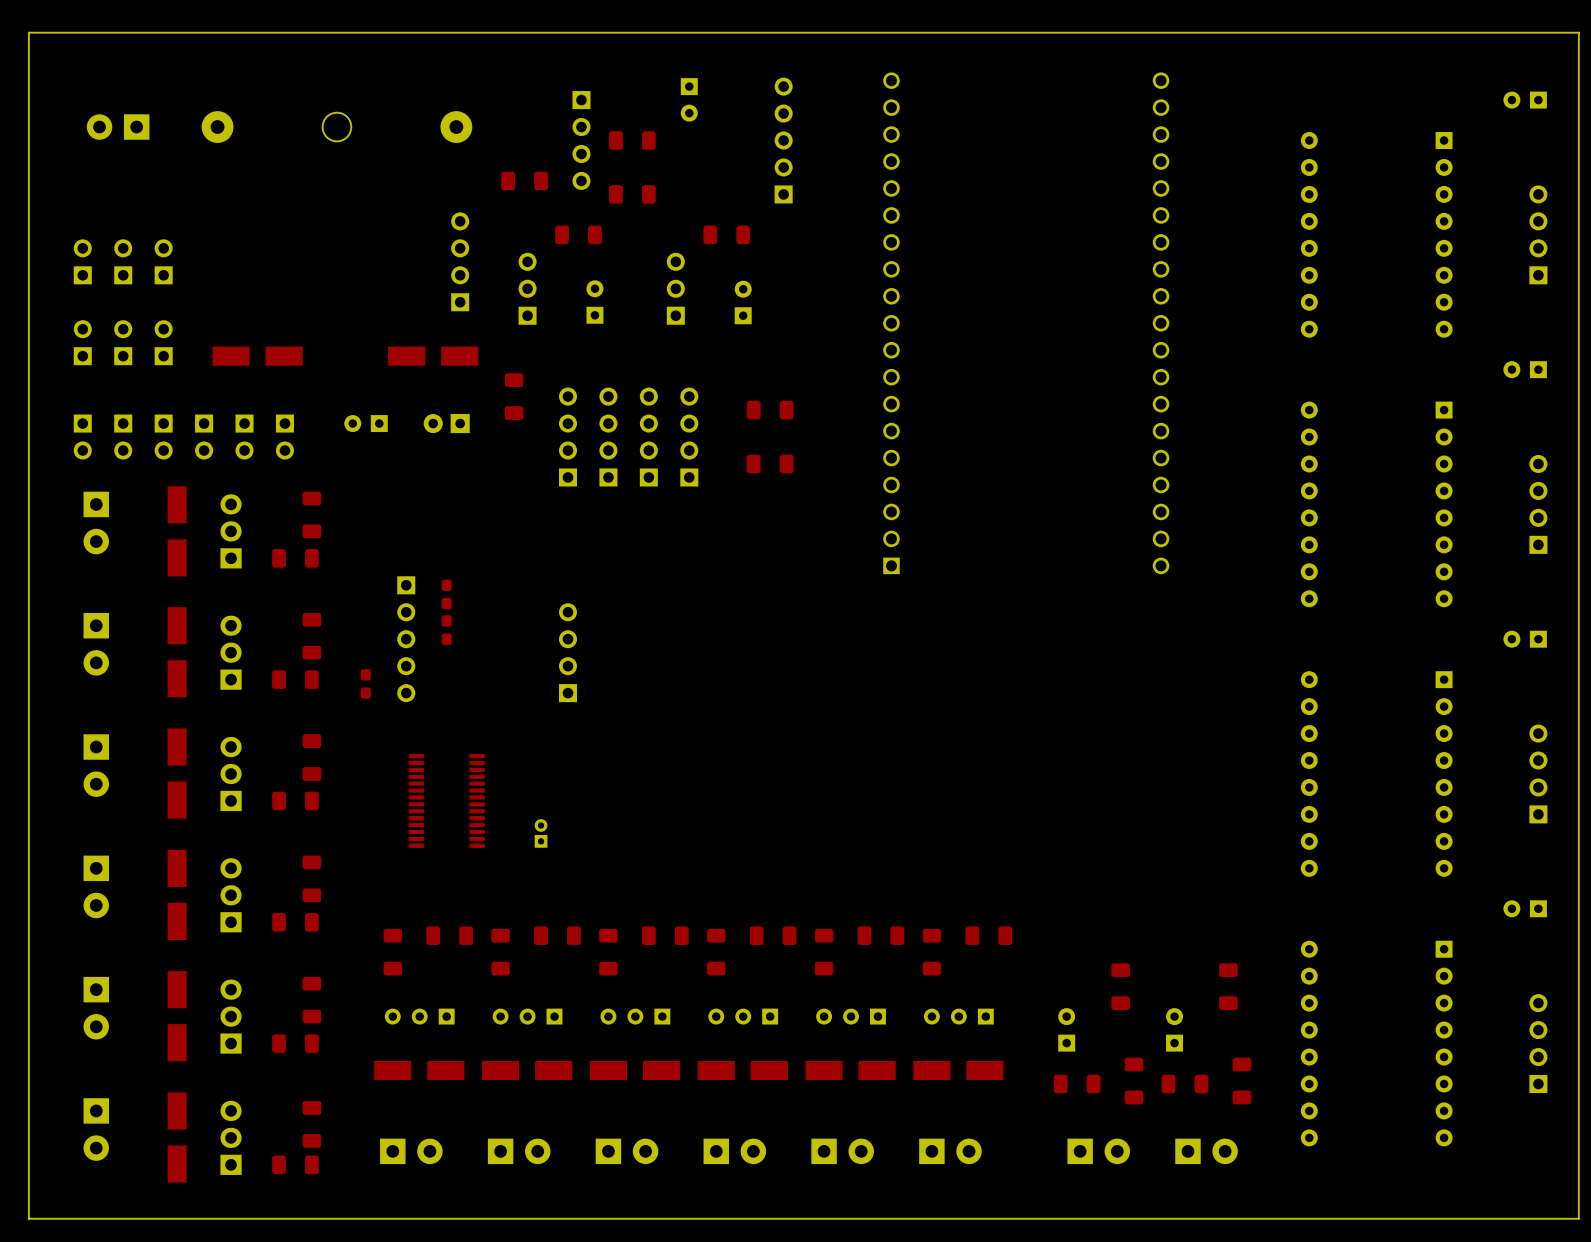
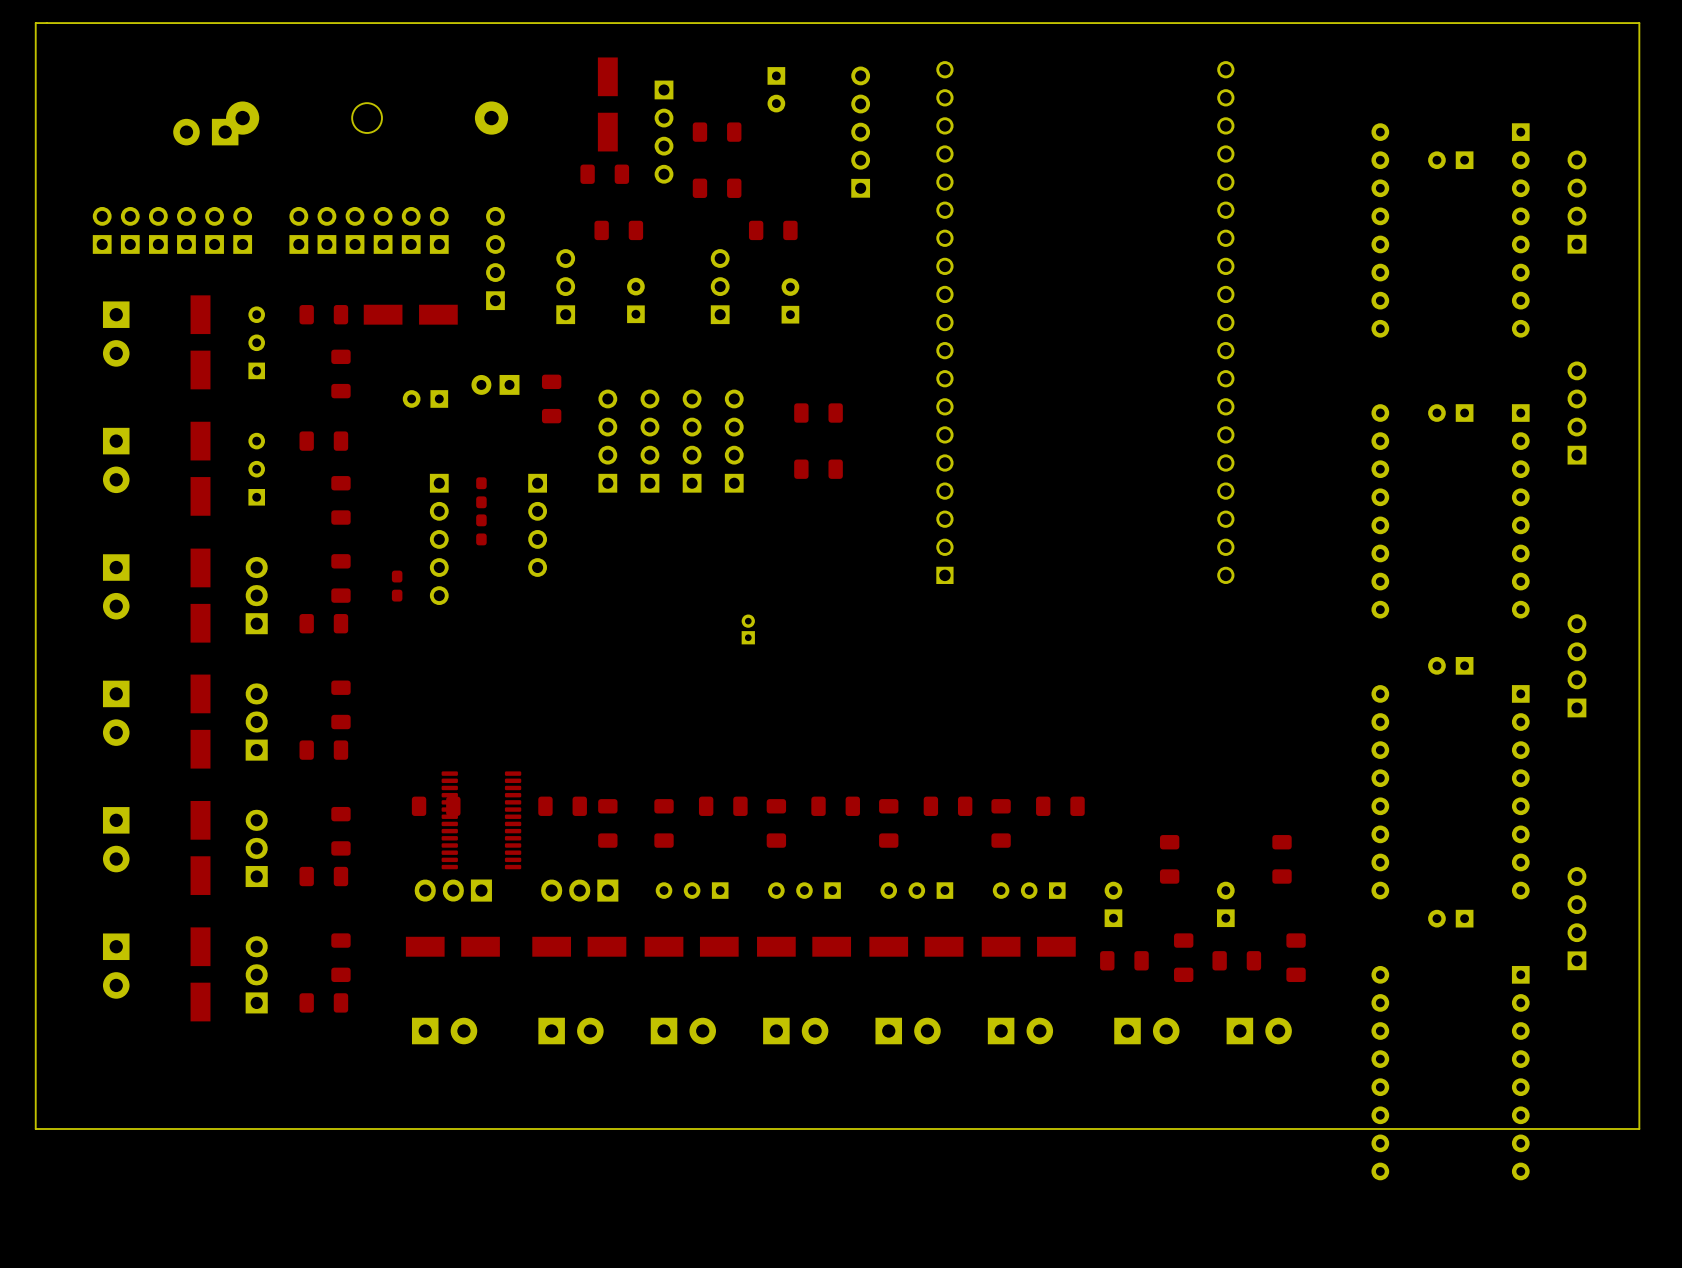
board edge: (1578, 32) (28, 32) (28, 1218) (1578, 1218) (1578, 32) -> (1639, 23) (1639, 1128) (35, 1128) (35, 23) (1639, 23)
part position: (689, 99) -> (776, 89)
part: (1525, 100) -> none
part: none -> (607, 104)
part position: (118, 127) -> (205, 132)
part footprint: [609, 131, 656, 150] -> [654, 80, 674, 184]
part: (581, 140) -> none
part: none -> (717, 132)
part position: (783, 140) -> (860, 132)
part: none -> (1450, 160)
part: (524, 180) -> none
part: none -> (604, 174)
part: (632, 194) -> none
part: none -> (717, 188)
part: none -> (102, 230)
part: none -> (130, 230)
part: none -> (158, 230)
part: none -> (186, 230)
part: none -> (214, 230)
part: none -> (242, 230)
part: none -> (298, 230)
part: none -> (326, 230)
part: none -> (355, 230)
part: none -> (383, 230)
part: none -> (411, 230)
part: none -> (439, 230)
part position: (1538, 234) -> (1576, 202)
part: (82, 261) -> none
part: (123, 261) -> none
part: (163, 261) -> none
part: none -> (323, 314)
part: none -> (410, 314)
part: none -> (116, 334)
part: (82, 342) -> none
part: (123, 342) -> none
part: (163, 342) -> none
part: none -> (200, 342)
part: none -> (256, 342)
part: (257, 356) -> none
part: (433, 356) -> none
part: (1525, 369) -> none
part: none -> (340, 373)
part: none -> (1450, 413)
part: none -> (1576, 413)
part footprint: [275, 414, 294, 460] -> [299, 431, 349, 451]
part position: (366, 423) -> (425, 398)
part position: (446, 423) -> (495, 384)
part: (82, 437) -> none
part: (123, 437) -> none
part: (163, 437) -> none
part: (204, 437) -> none
part: (244, 437) -> none
part: none -> (116, 460)
part: none -> (200, 468)
part: none -> (256, 469)
part: none -> (481, 492)
part: (1538, 504) -> none
part position: (311, 514) -> (340, 500)
part: (96, 522) -> none
part: none -> (481, 529)
part: (177, 531) -> none
part: (231, 531) -> none
part rotation: 0° (295, 558) -> 90° clockwise (340, 578)
part: none -> (116, 586)
part: none -> (397, 586)
part: none -> (200, 595)
part: none -> (256, 595)
part: (446, 594) -> none
part: none -> (323, 623)
part: none -> (748, 629)
part: (446, 630) -> none
part: (311, 636) -> none
part position: (406, 639) -> (439, 539)
part: (1525, 639) -> none
part: (96, 644) -> none
part: (177, 652) -> none
part: (231, 652) -> none
part rotation: 0° (568, 652) -> 180° (537, 525)
part position: (568, 652) -> (537, 525)
part: none -> (1450, 665)
part: none -> (1576, 665)
part rotation: 0° (295, 679) -> 90° clockwise (340, 704)
part: (365, 683) -> none
part: none -> (116, 713)
part: none -> (200, 721)
part: none -> (256, 722)
part: none -> (323, 750)
part: (311, 757) -> none
part: (96, 765) -> none
part: (177, 773) -> none
part: (231, 773) -> none
part: (1538, 773) -> none
part: none -> (436, 806)
part: none -> (562, 806)
part: none -> (723, 806)
part: none -> (835, 806)
part: none -> (948, 806)
part: none -> (1060, 806)
part rotation: 0° (295, 800) -> 90° clockwise (340, 831)
part: none -> (607, 823)
part: none -> (664, 823)
part: none -> (776, 823)
part: none -> (888, 823)
part: none -> (1001, 823)
part: none -> (116, 839)
part: none -> (200, 847)
part: none -> (256, 848)
part: (541, 833) -> none
part: none -> (1169, 859)
part: none -> (1282, 859)
part: none -> (323, 876)
part: none -> (453, 890)
part: none -> (579, 890)
part: none -> (692, 890)
part: none -> (804, 890)
part: none -> (916, 890)
part: none -> (1029, 890)
part: (311, 878) -> none
part: none -> (1113, 904)
part: none -> (1225, 904)
part: (96, 886) -> none
part: (177, 894) -> none
part: (231, 895) -> none
part: none -> (1450, 918)
part: none -> (1576, 918)
part: (1525, 908) -> none
part rotation: 0° (295, 922) -> 90° clockwise (340, 957)
part: none -> (452, 946)
part: none -> (579, 946)
part: none -> (691, 946)
part: none -> (804, 946)
part: none -> (916, 946)
part: none -> (1028, 946)
part: none -> (1183, 957)
part: none -> (1296, 957)
part: (449, 935) -> none
part: (557, 935) -> none
part: (665, 935) -> none
part: (773, 935) -> none
part: (880, 935) -> none
part: (988, 935) -> none
part: none -> (1124, 960)
part: none -> (1236, 960)
part: none -> (116, 966)
part: none -> (200, 974)
part: none -> (256, 974)
part: (392, 952) -> none
part: (500, 952) -> none
part: (608, 952) -> none
part: (716, 952) -> none
part: (824, 952) -> none
part: (931, 952) -> none
part: none -> (323, 1002)
part: (1120, 986) -> none
part: (1228, 986) -> none
part: (311, 1000) -> none
part: none -> (444, 1031)
part: none -> (571, 1031)
part: none -> (683, 1031)
part: none -> (795, 1031)
part: none -> (908, 1031)
part: none -> (1020, 1031)
part: none -> (1146, 1031)
part: none -> (1259, 1031)
part: (96, 1008) -> none
part: (177, 1016) -> none
part: (231, 1016) -> none
part: (419, 1016) -> none
part: (527, 1016) -> none
part: (635, 1016) -> none
part: (743, 1016) -> none
part: (851, 1016) -> none
part: (958, 1016) -> none
part: (1066, 1029) -> none
part: (1174, 1029) -> none
part: (295, 1043) -> none
part: (1538, 1043) -> none
part: (419, 1070) -> none
part: (527, 1070) -> none
part: (634, 1070) -> none
part: (742, 1070) -> none
part: (850, 1070) -> none
part: (958, 1070) -> none
part: (1134, 1081) -> none
part: (1241, 1081) -> none
part: (1077, 1083) -> none
part: (1185, 1083) -> none
part: (311, 1124) -> none
part: (96, 1129) -> none
part: (177, 1137) -> none
part: (231, 1137) -> none
part: (411, 1151) -> none
part: (519, 1151) -> none
part: (627, 1151) -> none
part: (734, 1151) -> none
part: (842, 1151) -> none
part: (950, 1151) -> none
part: (1098, 1151) -> none
part: (1206, 1151) -> none
part: (295, 1164) -> none

